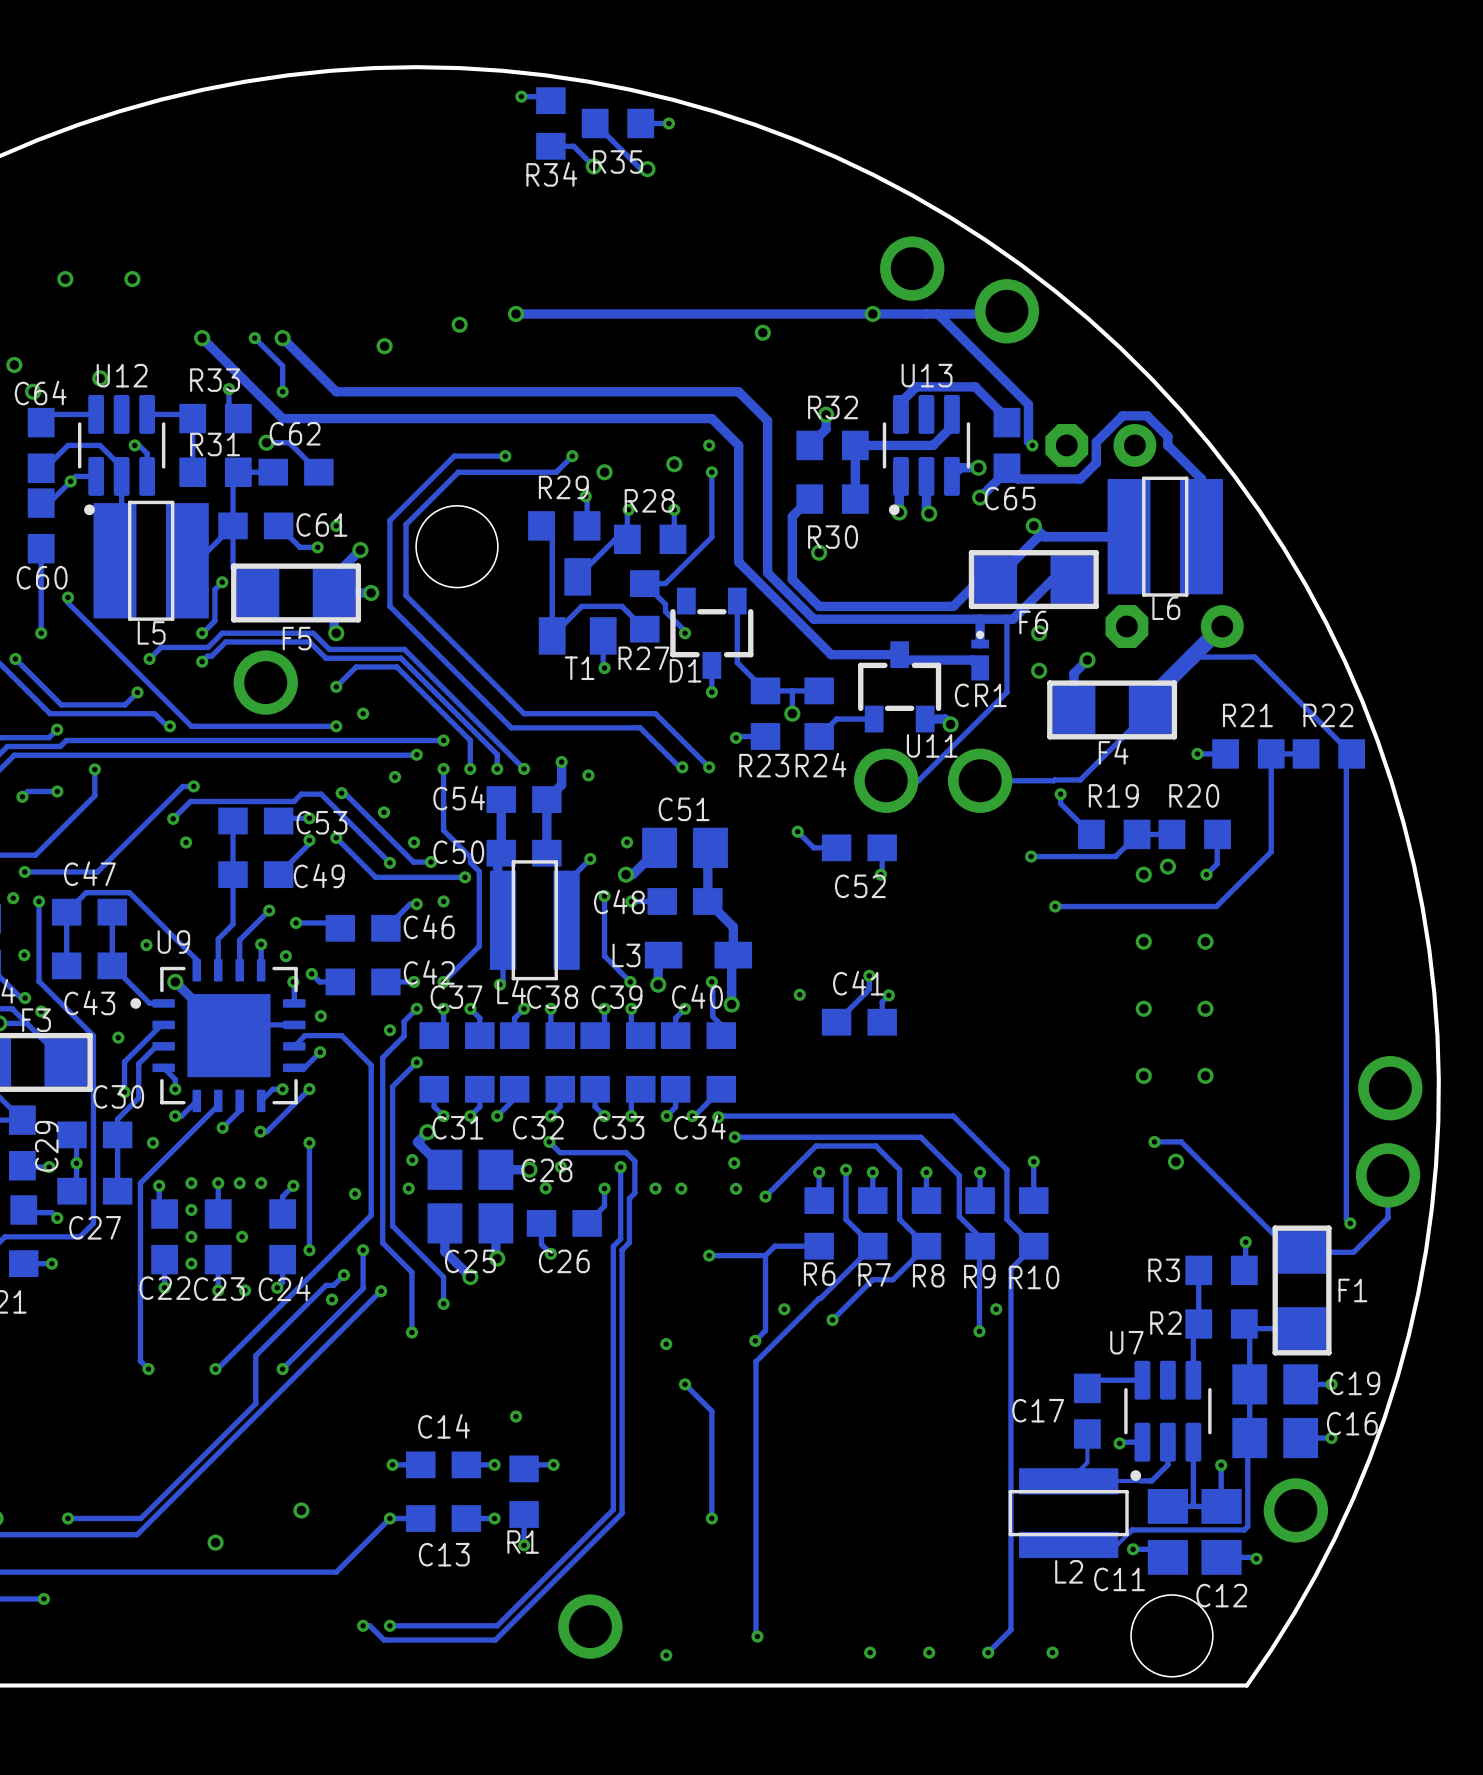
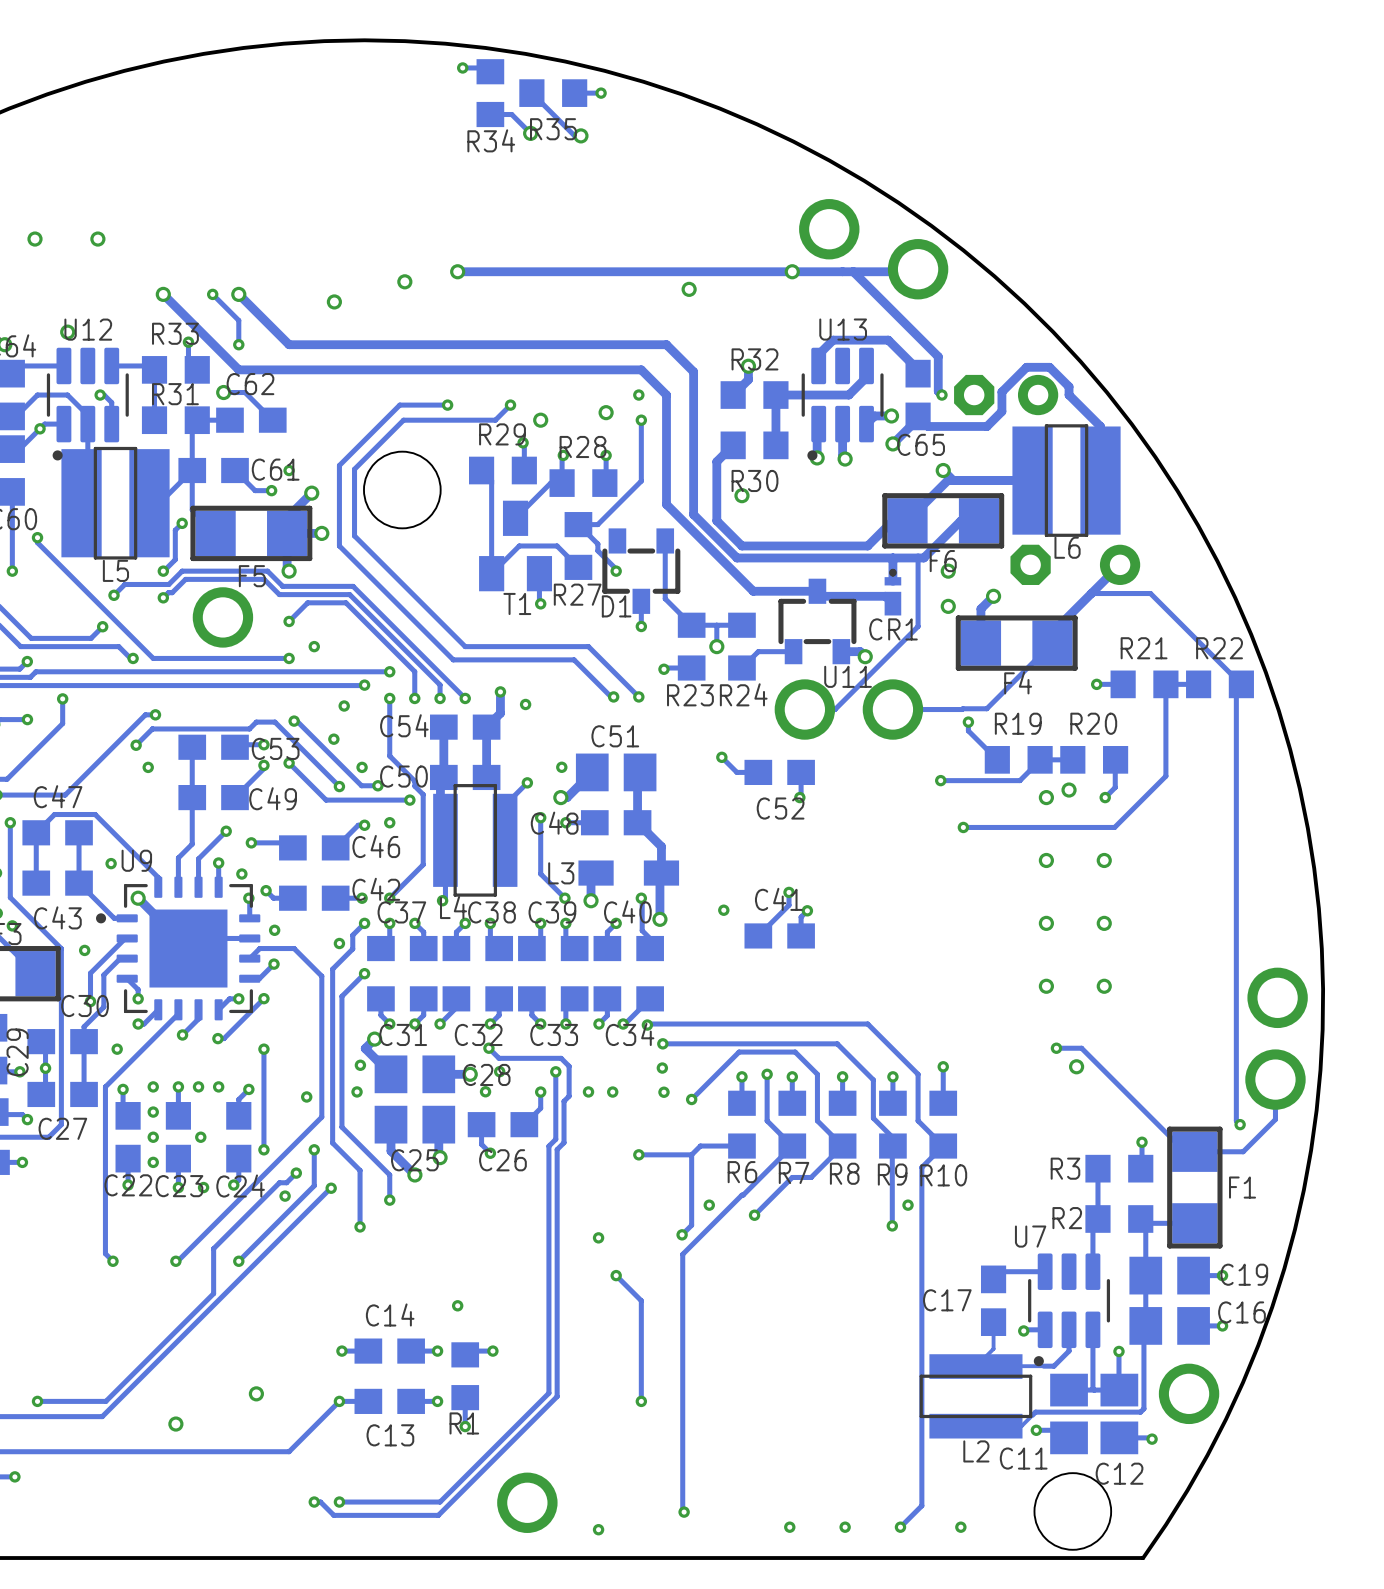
track width: thick (1222, 626) (1150, 698) (1150, 709) -> thin (1120, 564) (1052, 632) (1052, 643)

